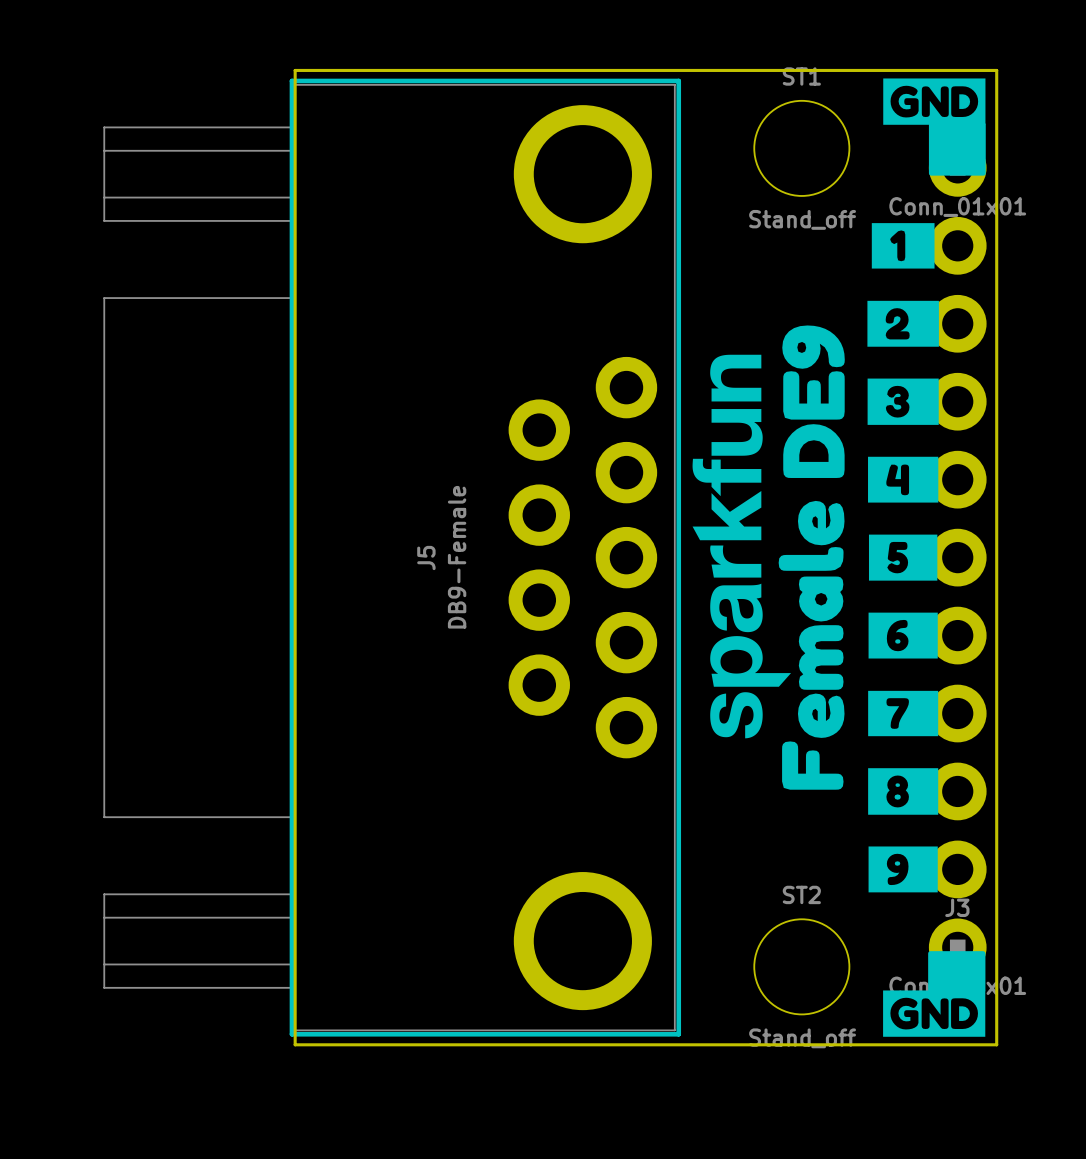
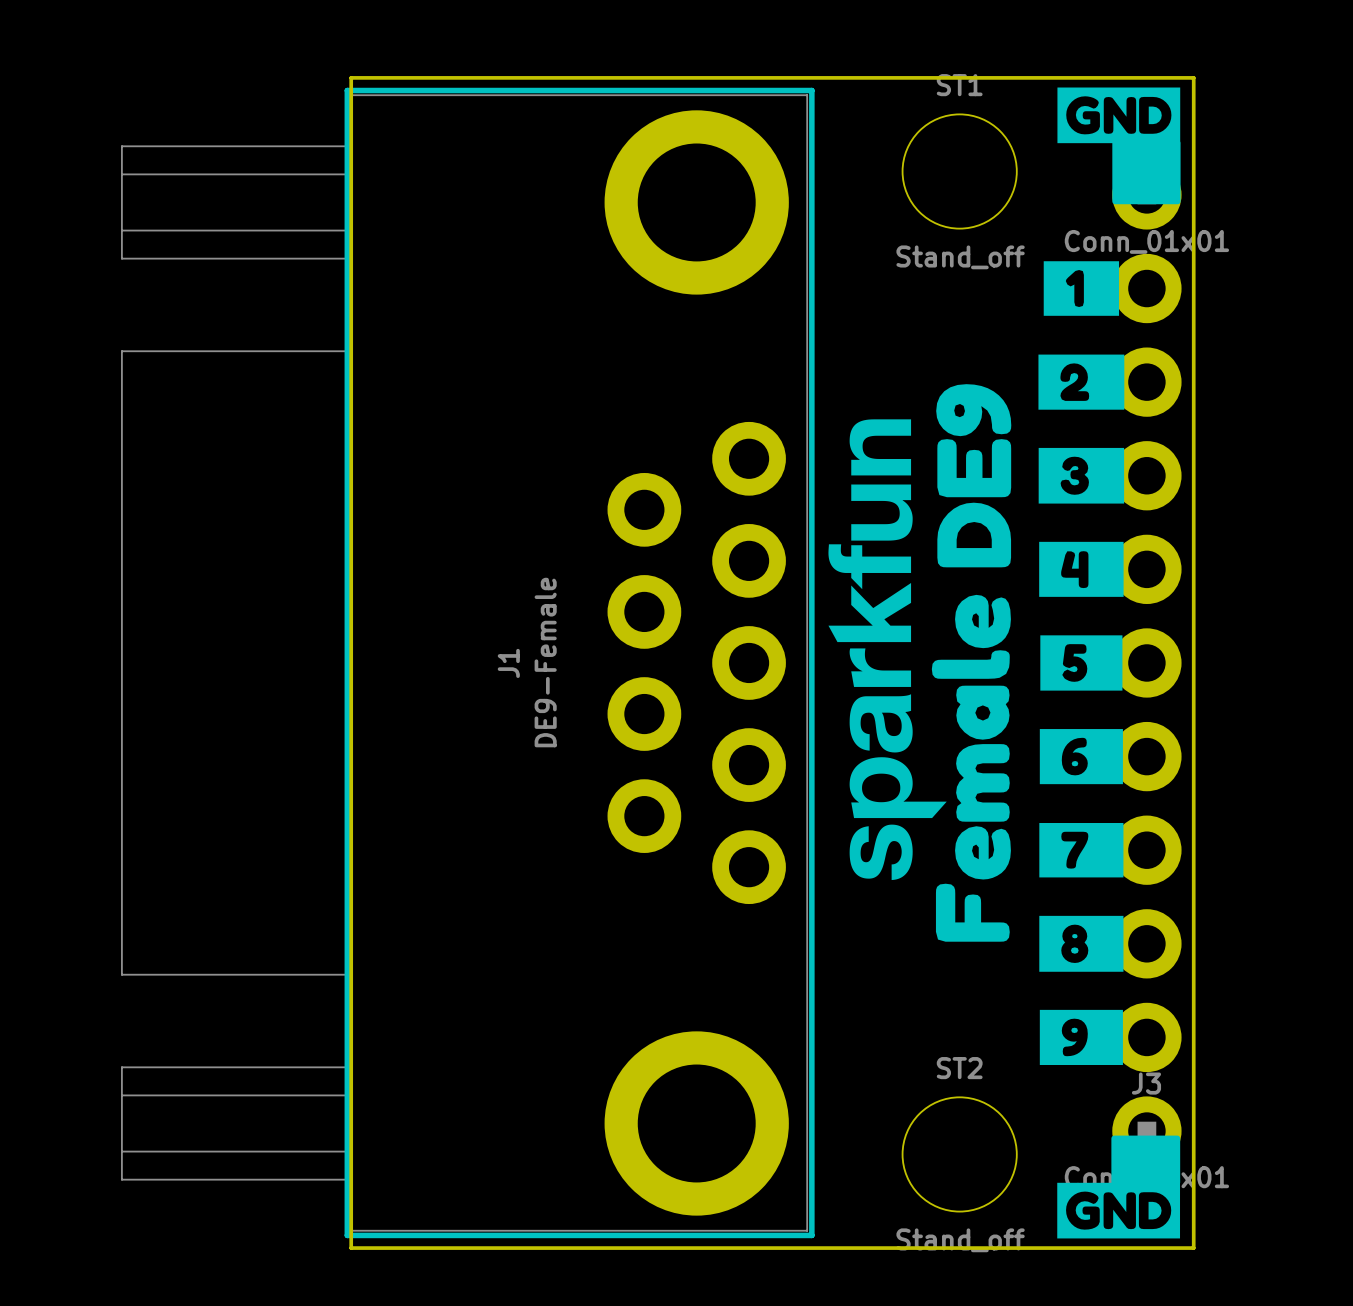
J5: DB9-Female (392, 557) -> none
J1: none -> DE9-Female (468, 662)

